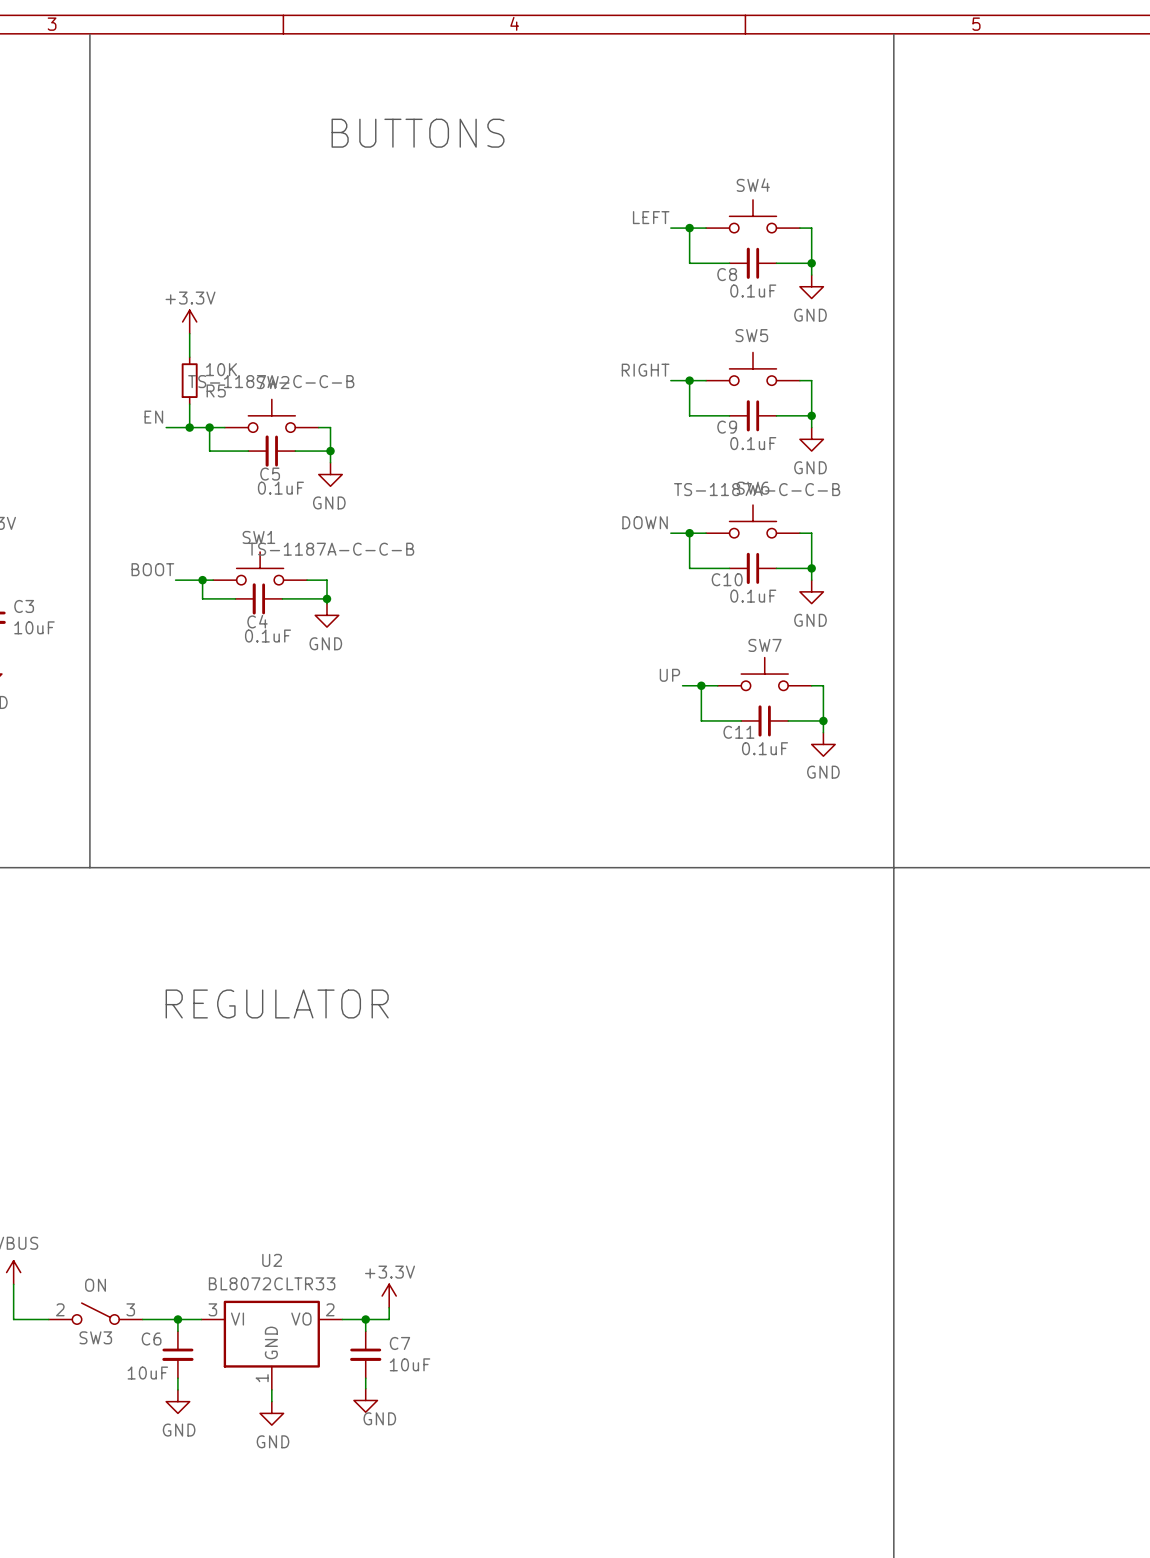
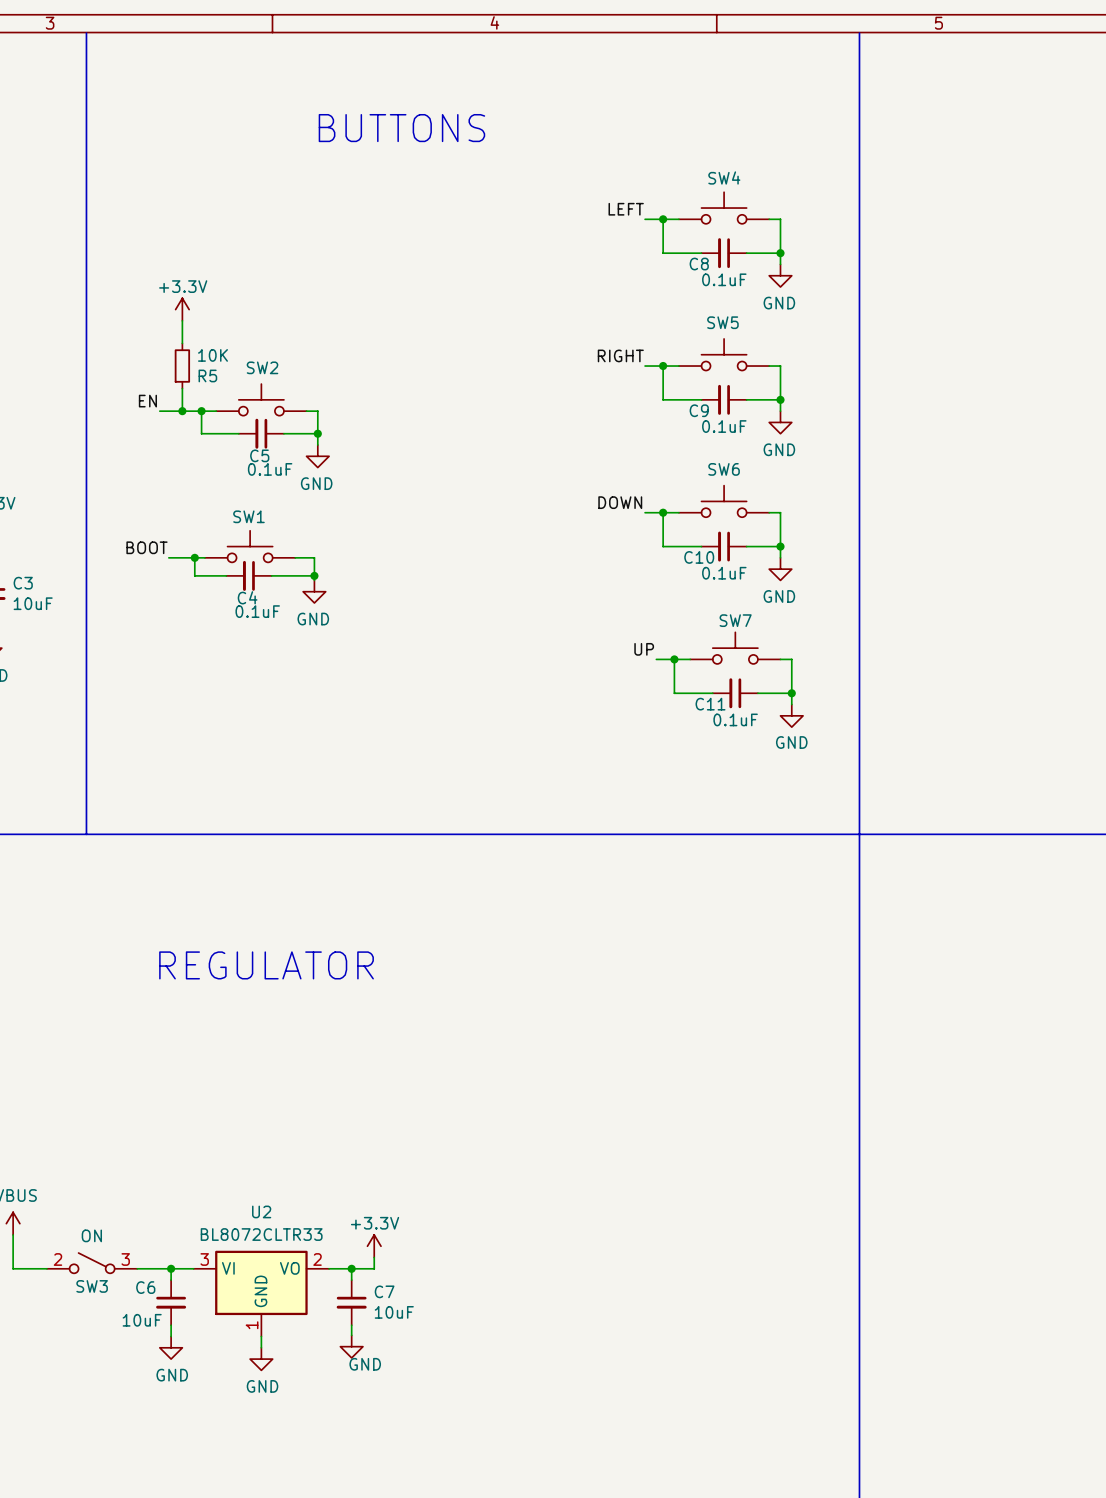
SW2 value: TS-1187A-C-C-B (271, 381) -> none
SW6 value: TS-1187A-C-C-B (757, 489) -> none
SW1 value: TS-1187A-C-C-B (331, 549) -> none

